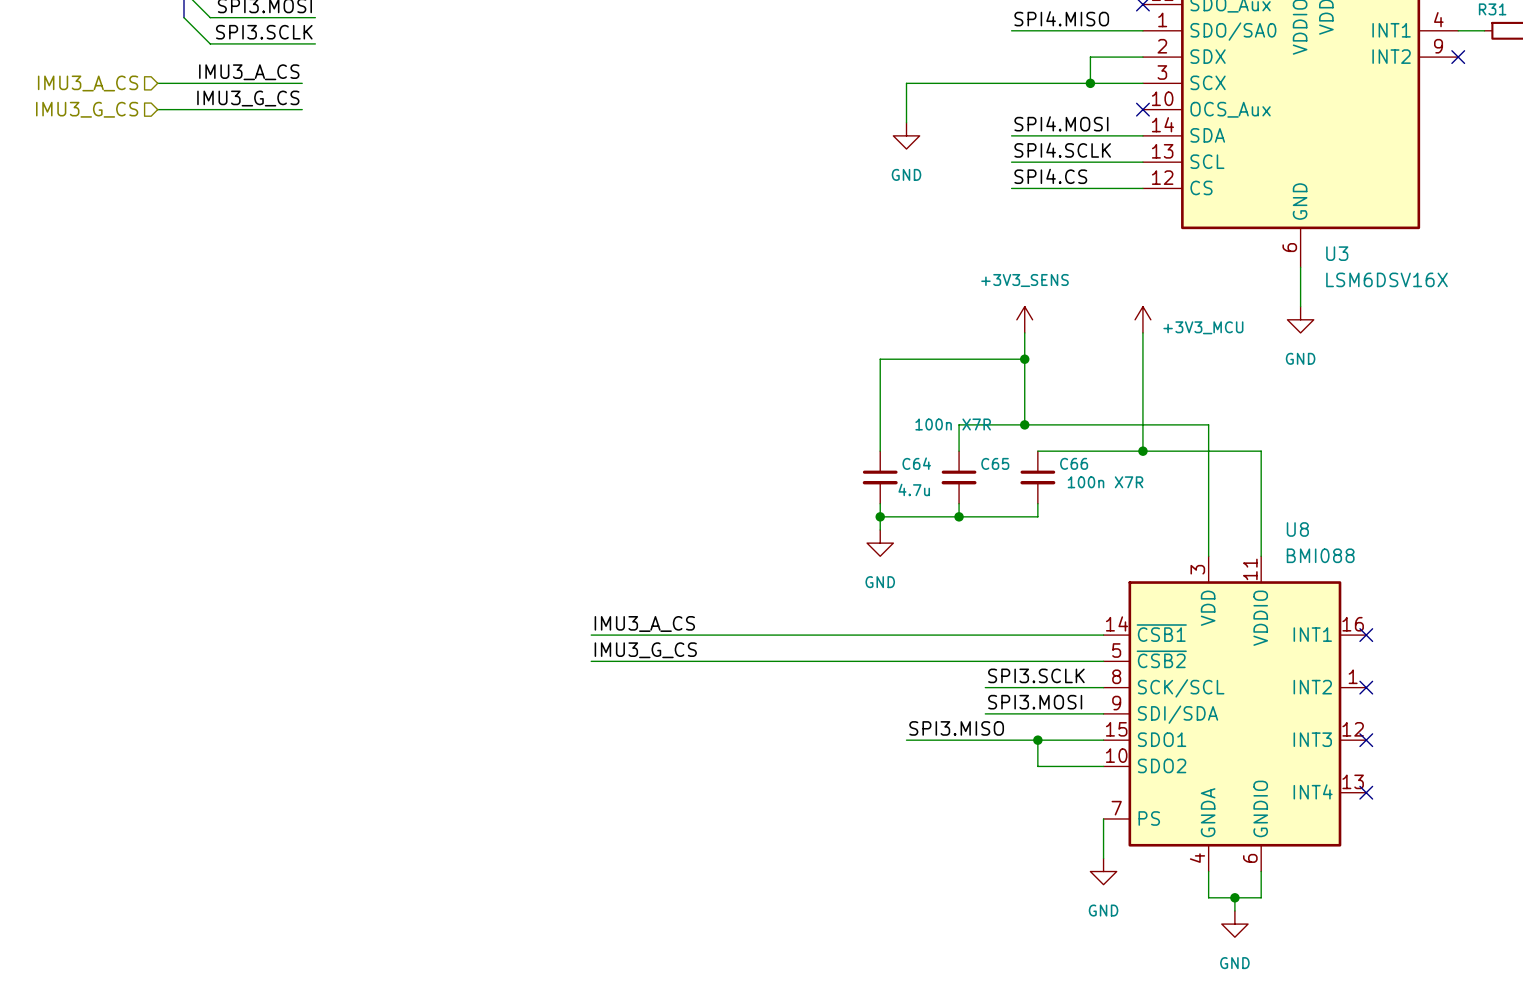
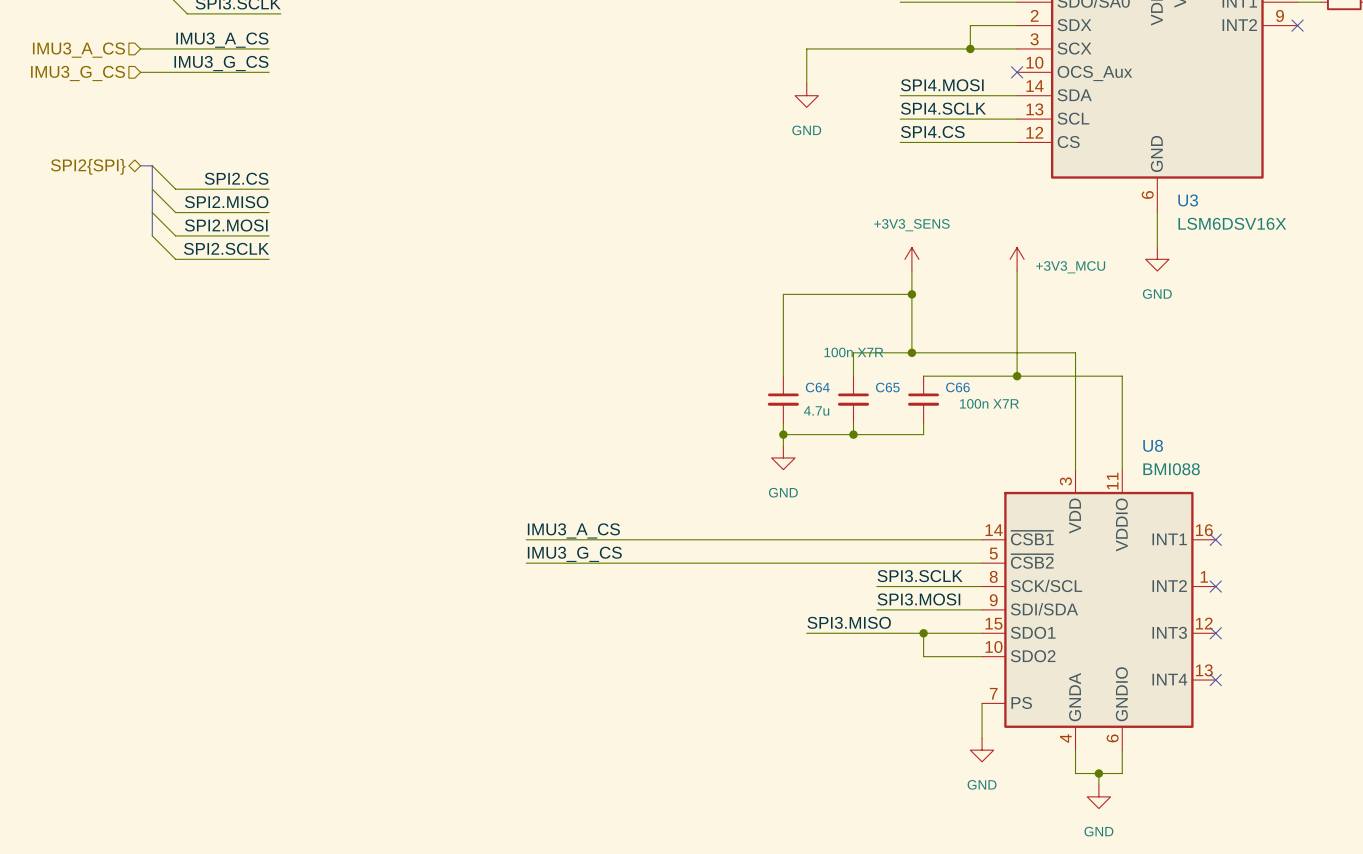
bus: none -> (140, 165) (152, 165) (152, 235)
wire: none -> (152, 165) (175, 189) (269, 189)
hierarchical label: none -> SPI2{SPI} (88, 166)
label: none -> SPI2.CS (236, 178)
wire: none -> (152, 189) (175, 212) (269, 212)
label: none -> SPI2.MISO (226, 202)
wire: none -> (152, 212) (175, 235) (269, 235)
label: none -> SPI2.MOSI (226, 225)
wire: none -> (152, 235) (175, 259) (269, 259)
label: none -> SPI2.SCLK (226, 248)

